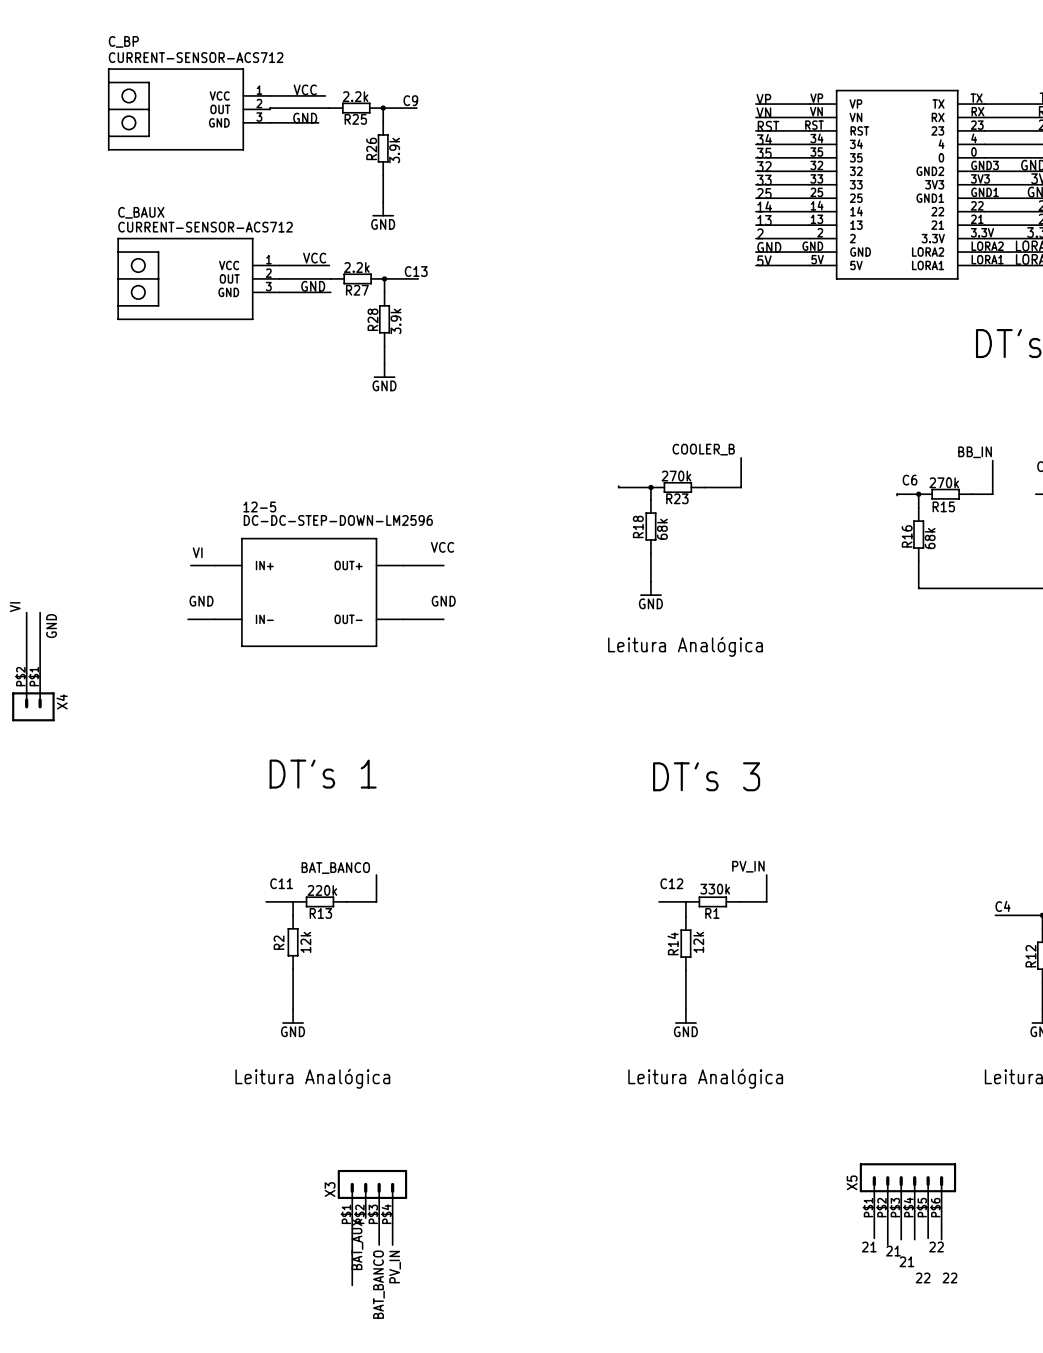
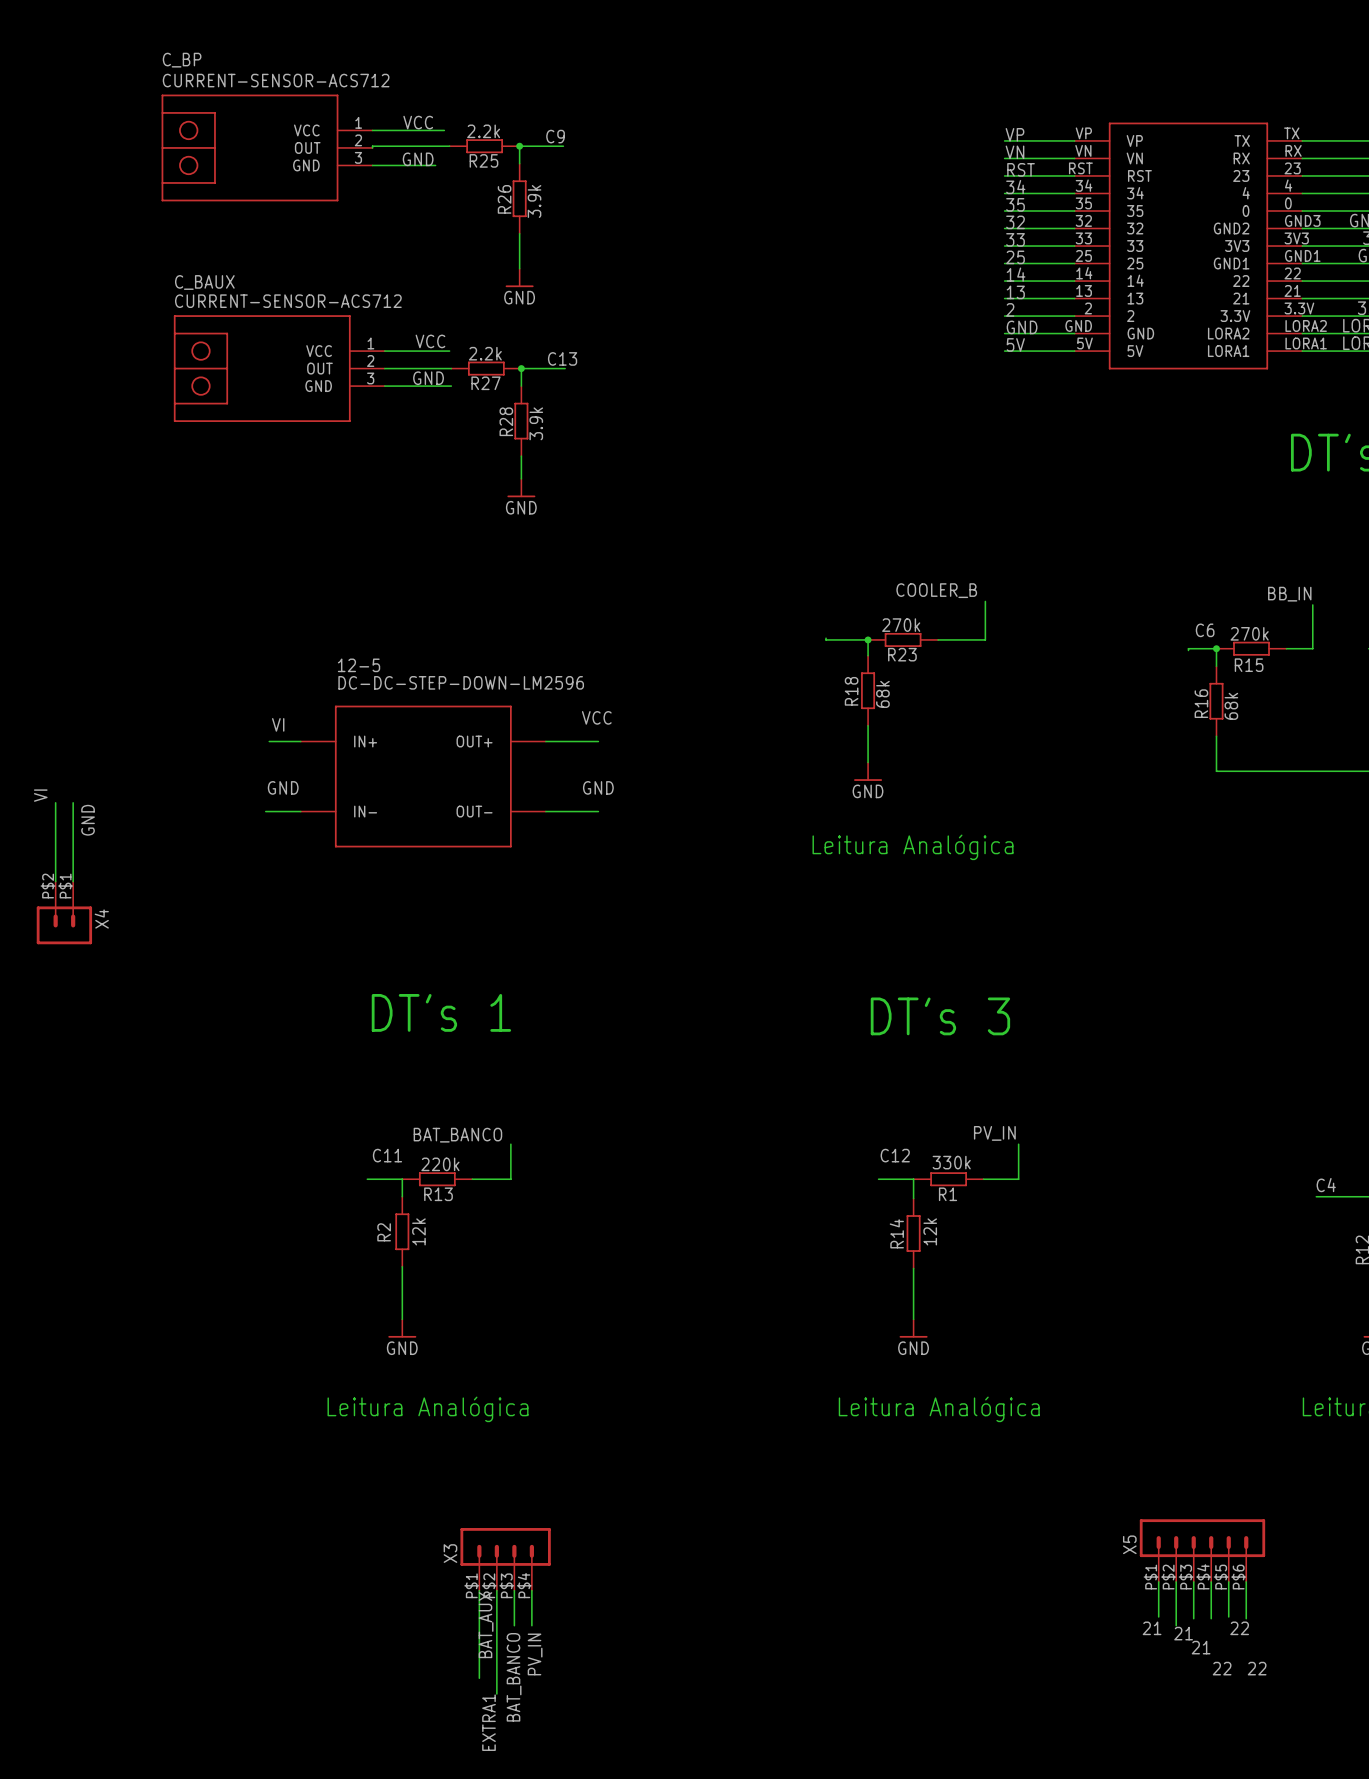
wire: none -> (496, 1590) (496, 1694)
label: none -> EXTRA1 (488, 1722)

